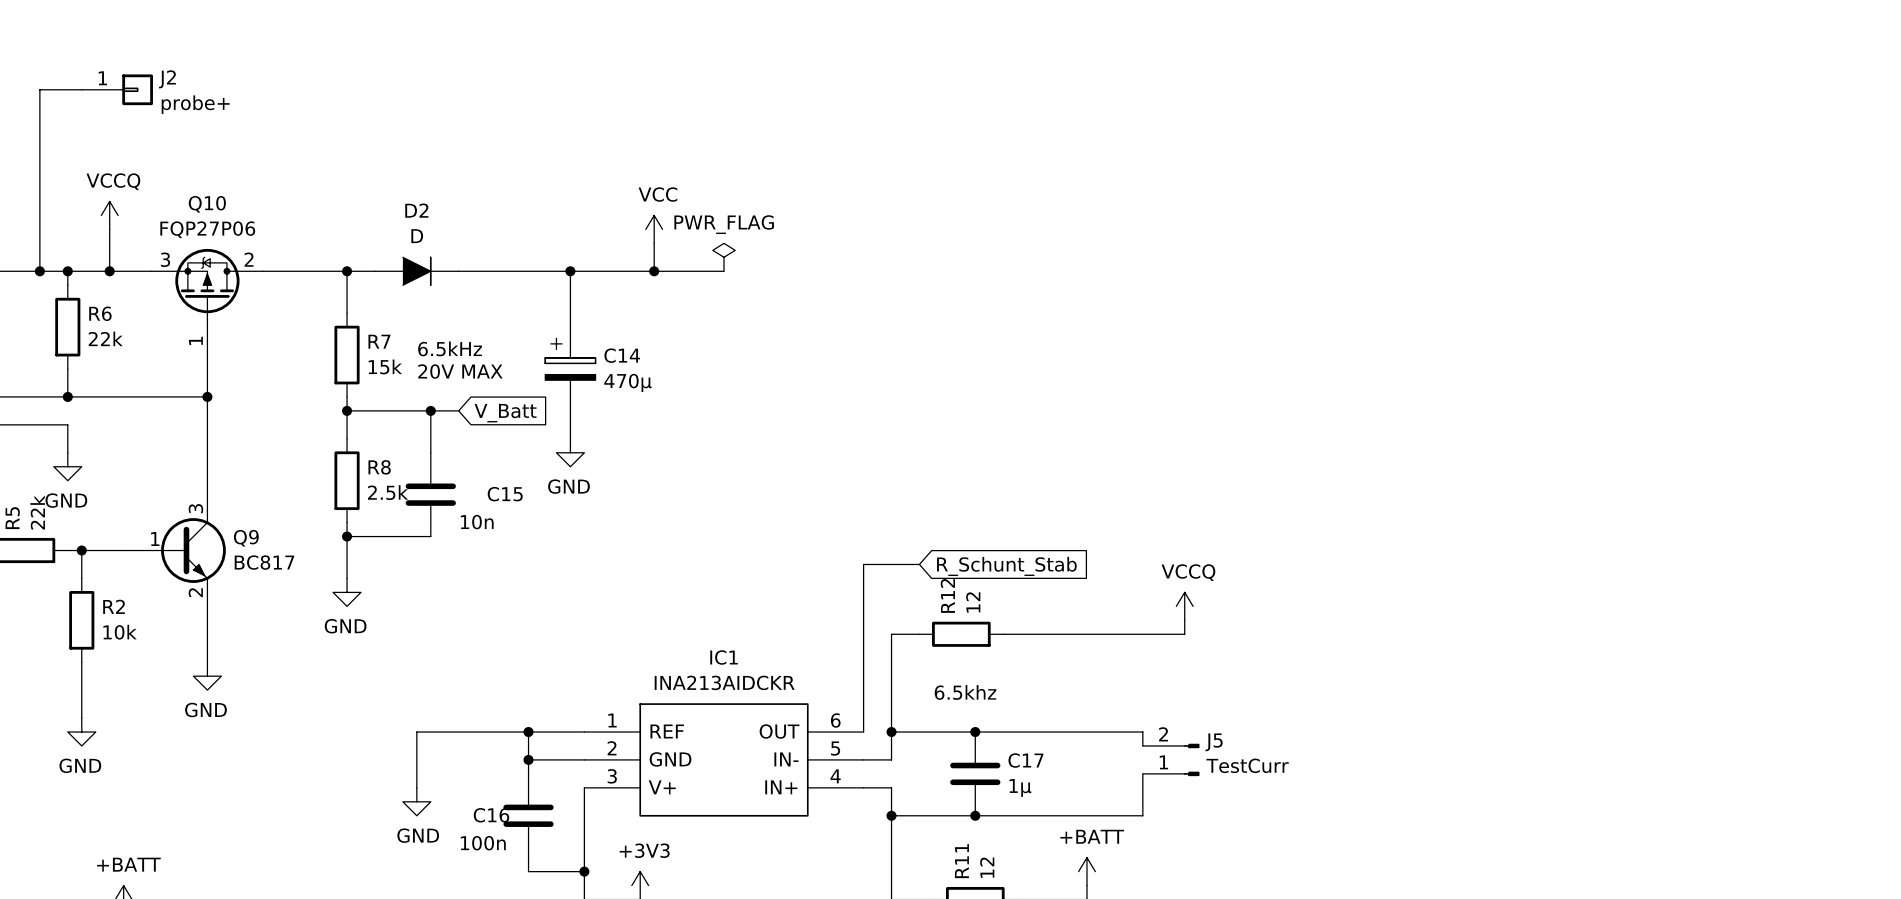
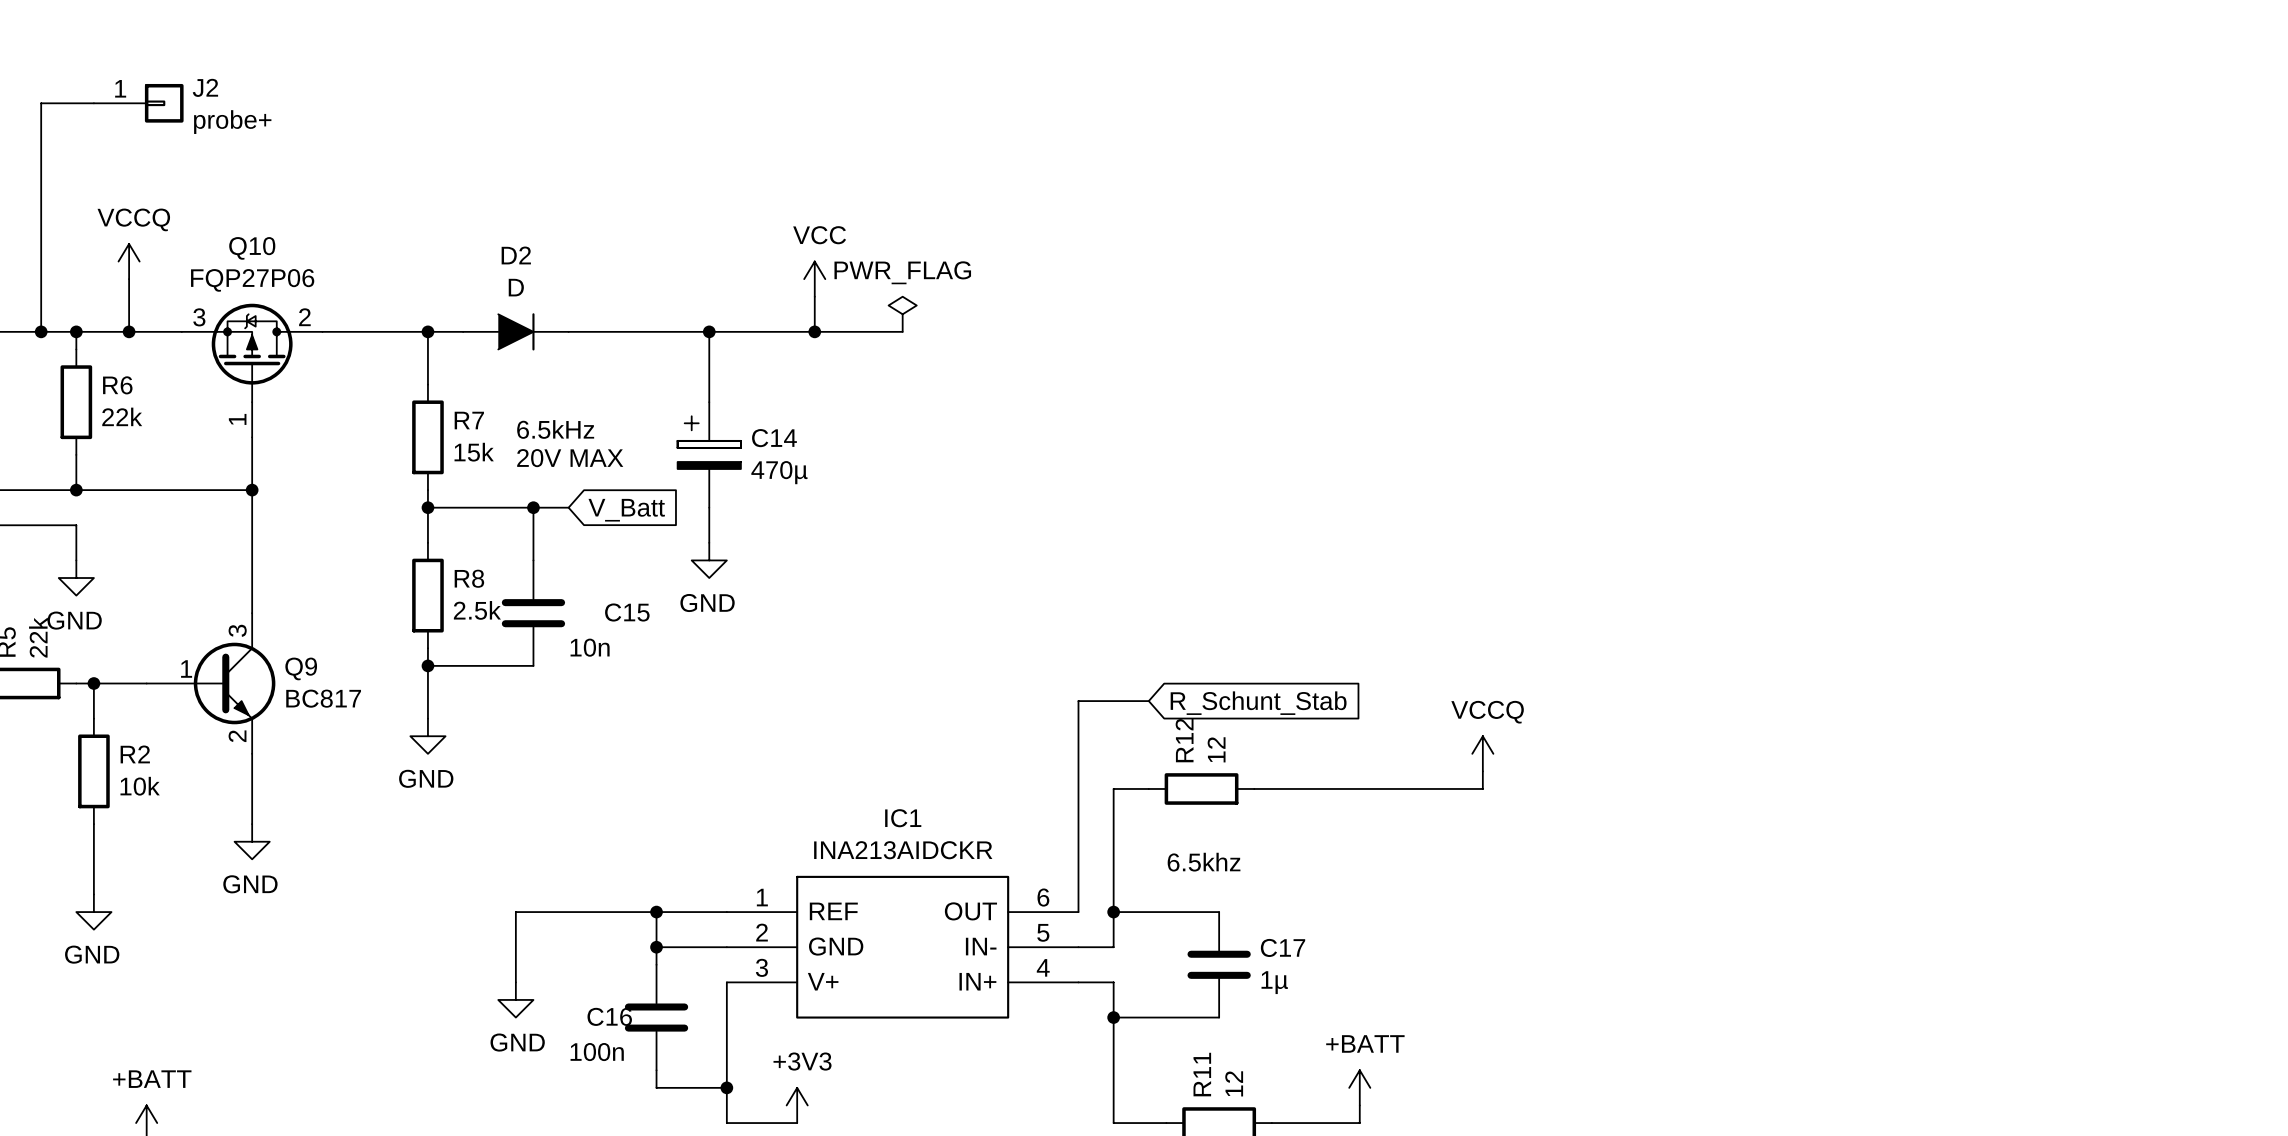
wire: (975, 732) (1142, 732) (1142, 745) -> none
junction: (975, 732) -> none
J5: TestCurr (1171, 759) -> none
wire: (1142, 773) (1142, 815) (975, 815) -> none
junction: (975, 815) -> none

